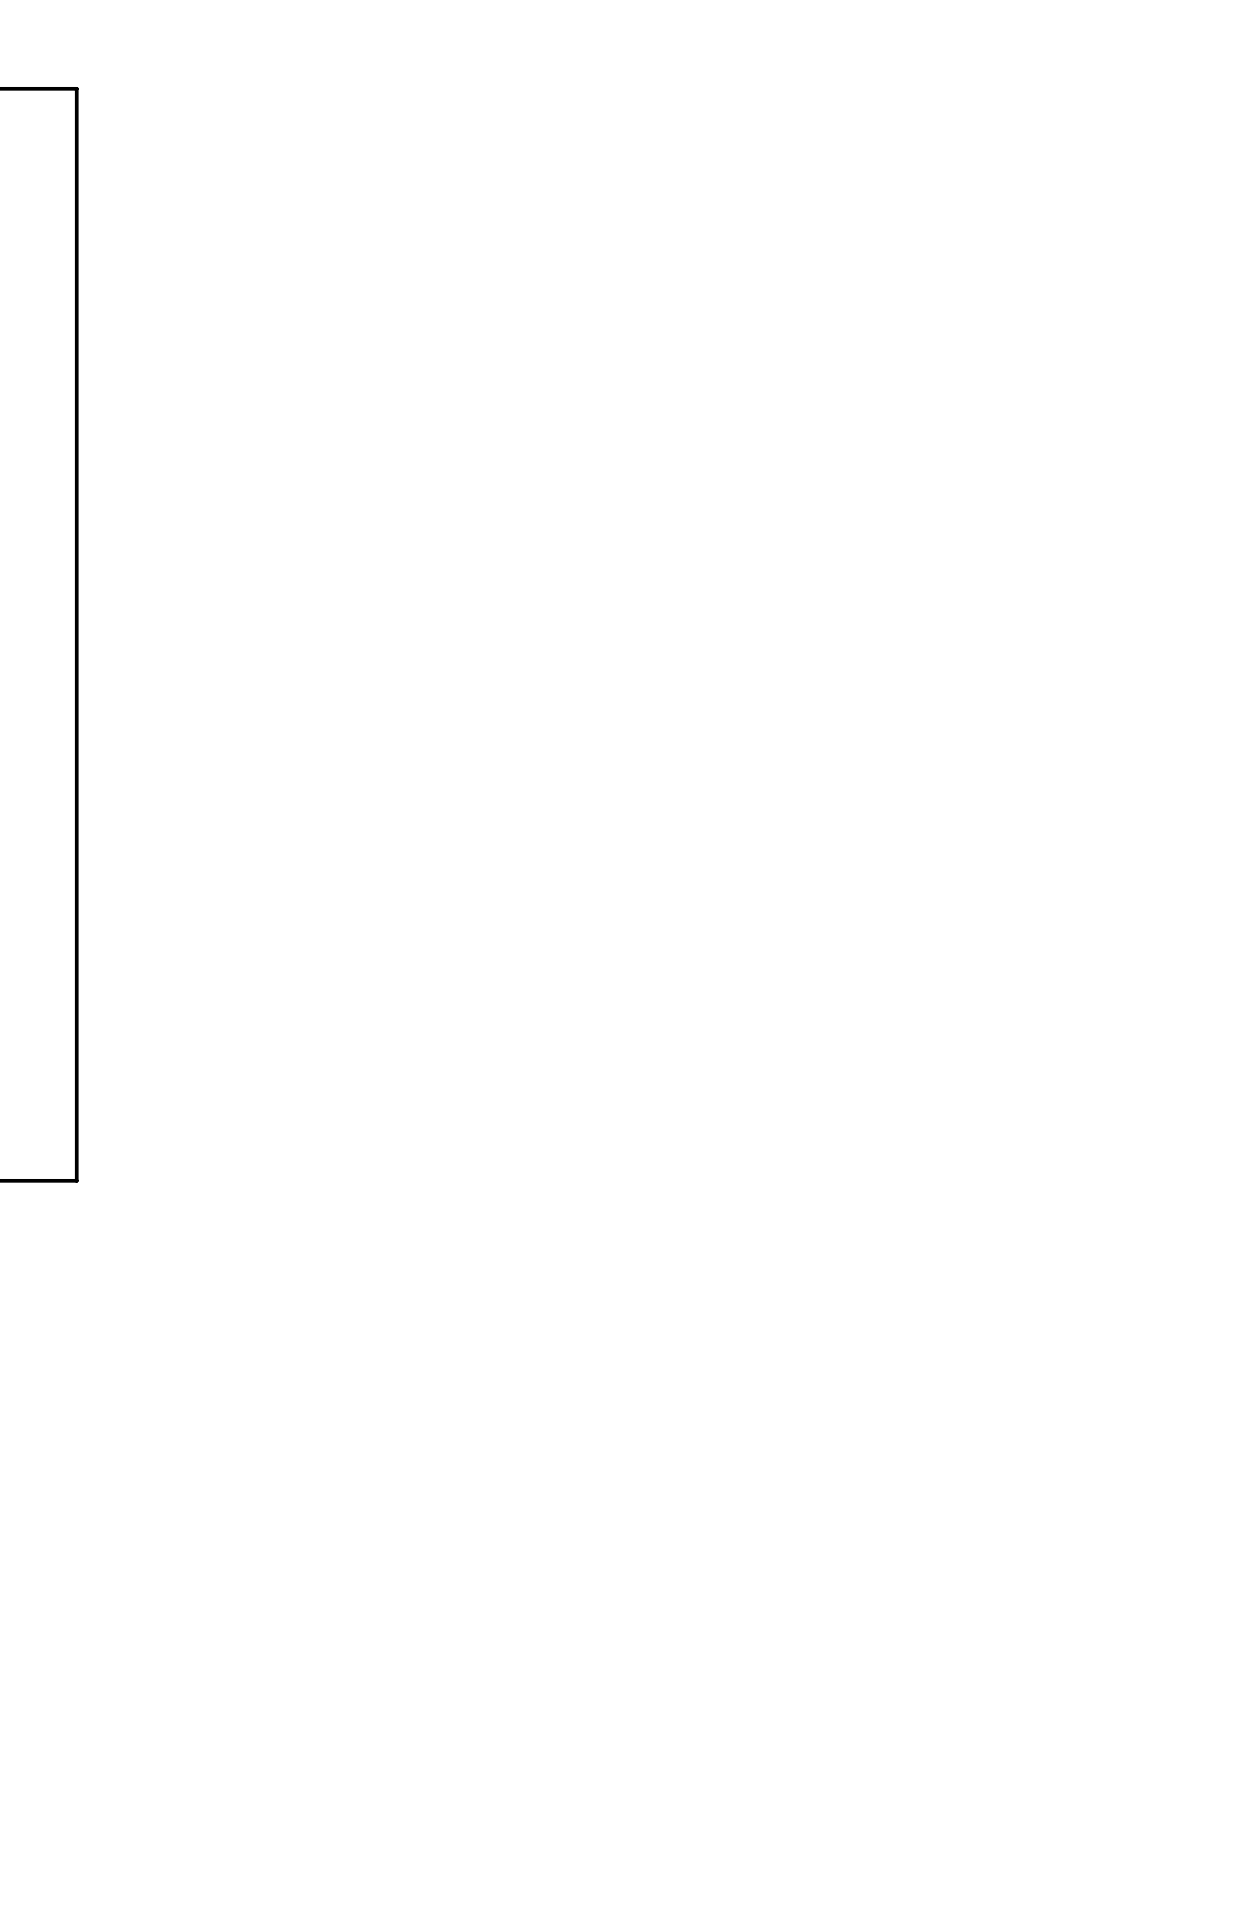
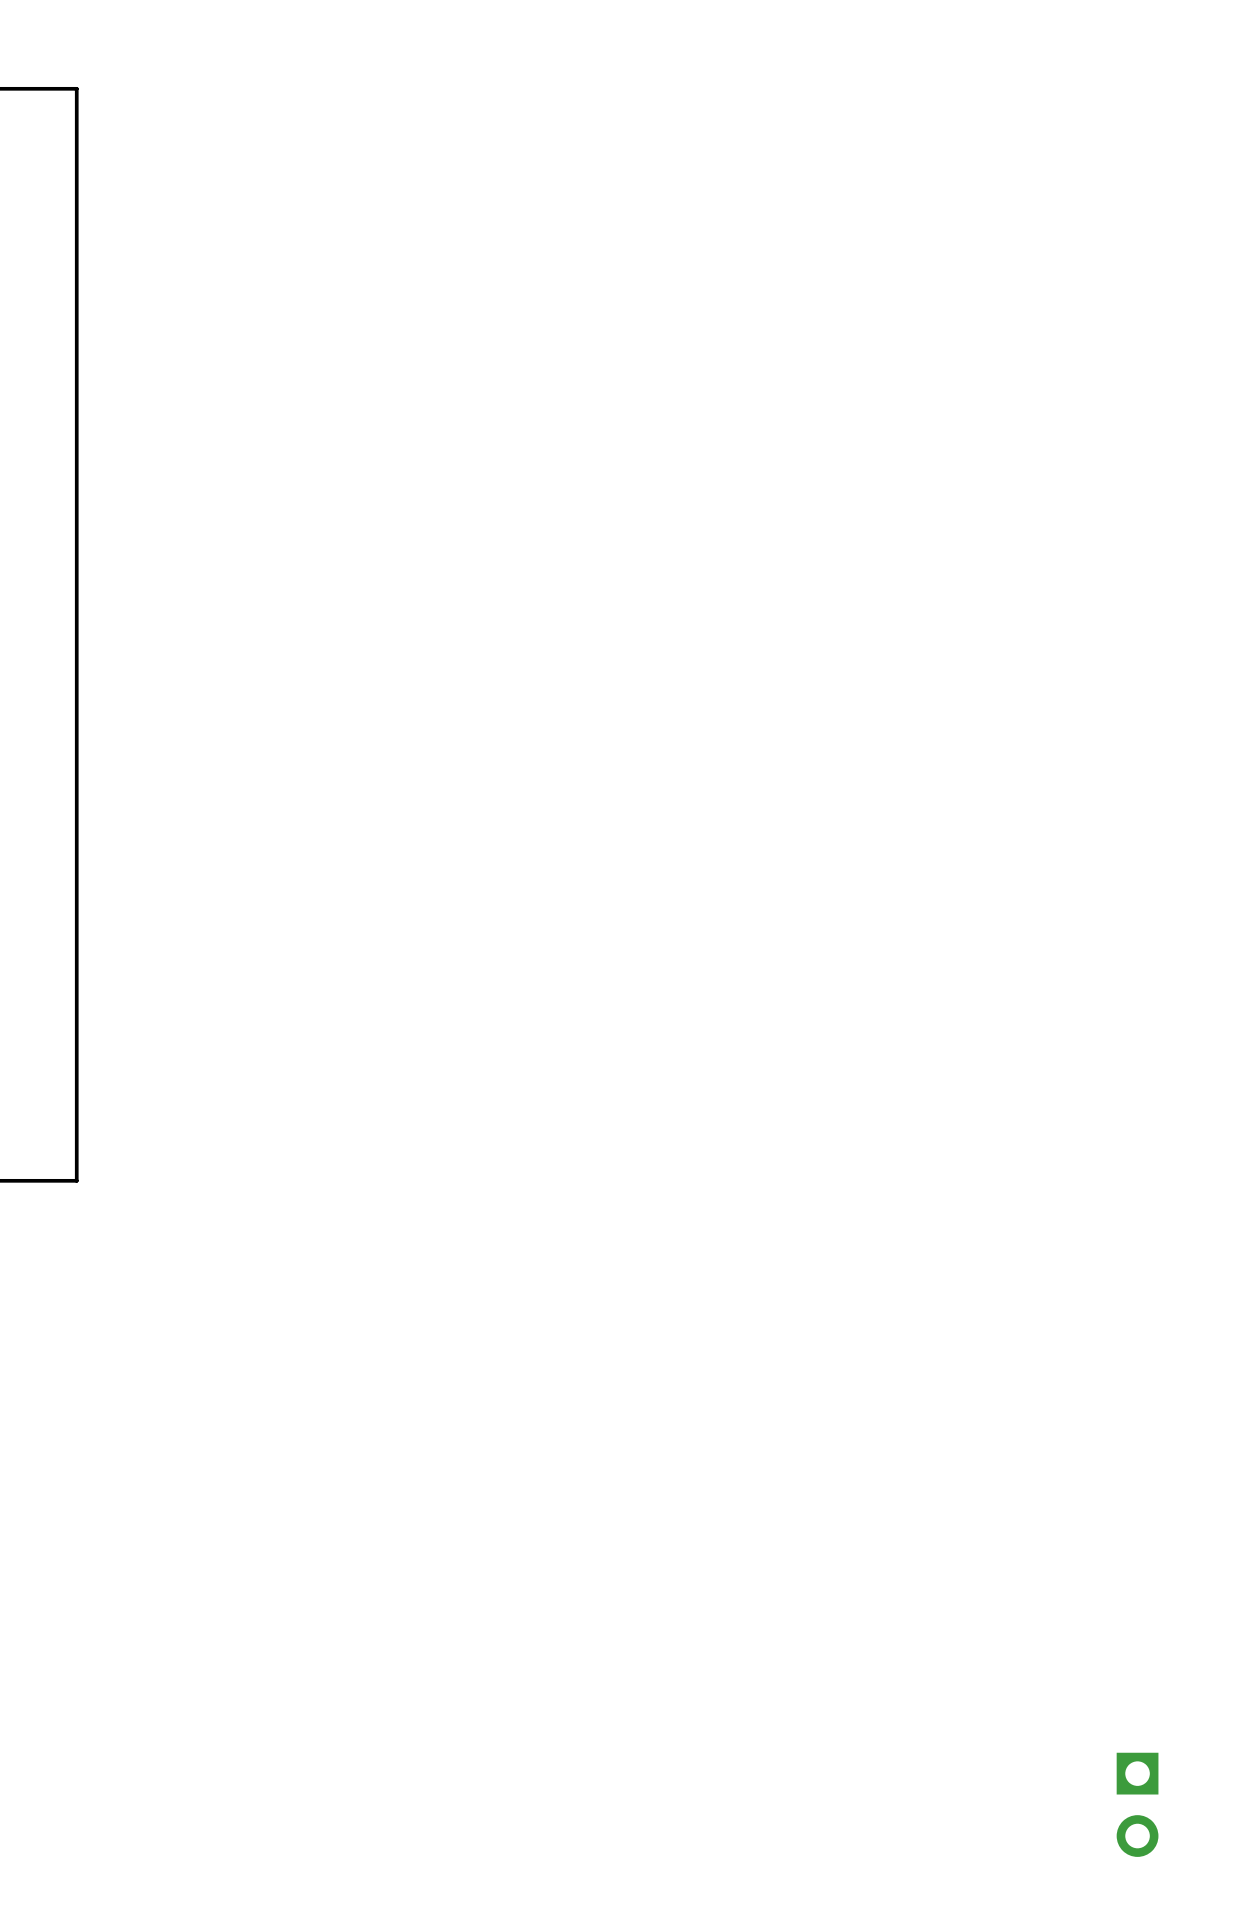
part: none -> (1137, 1804)

